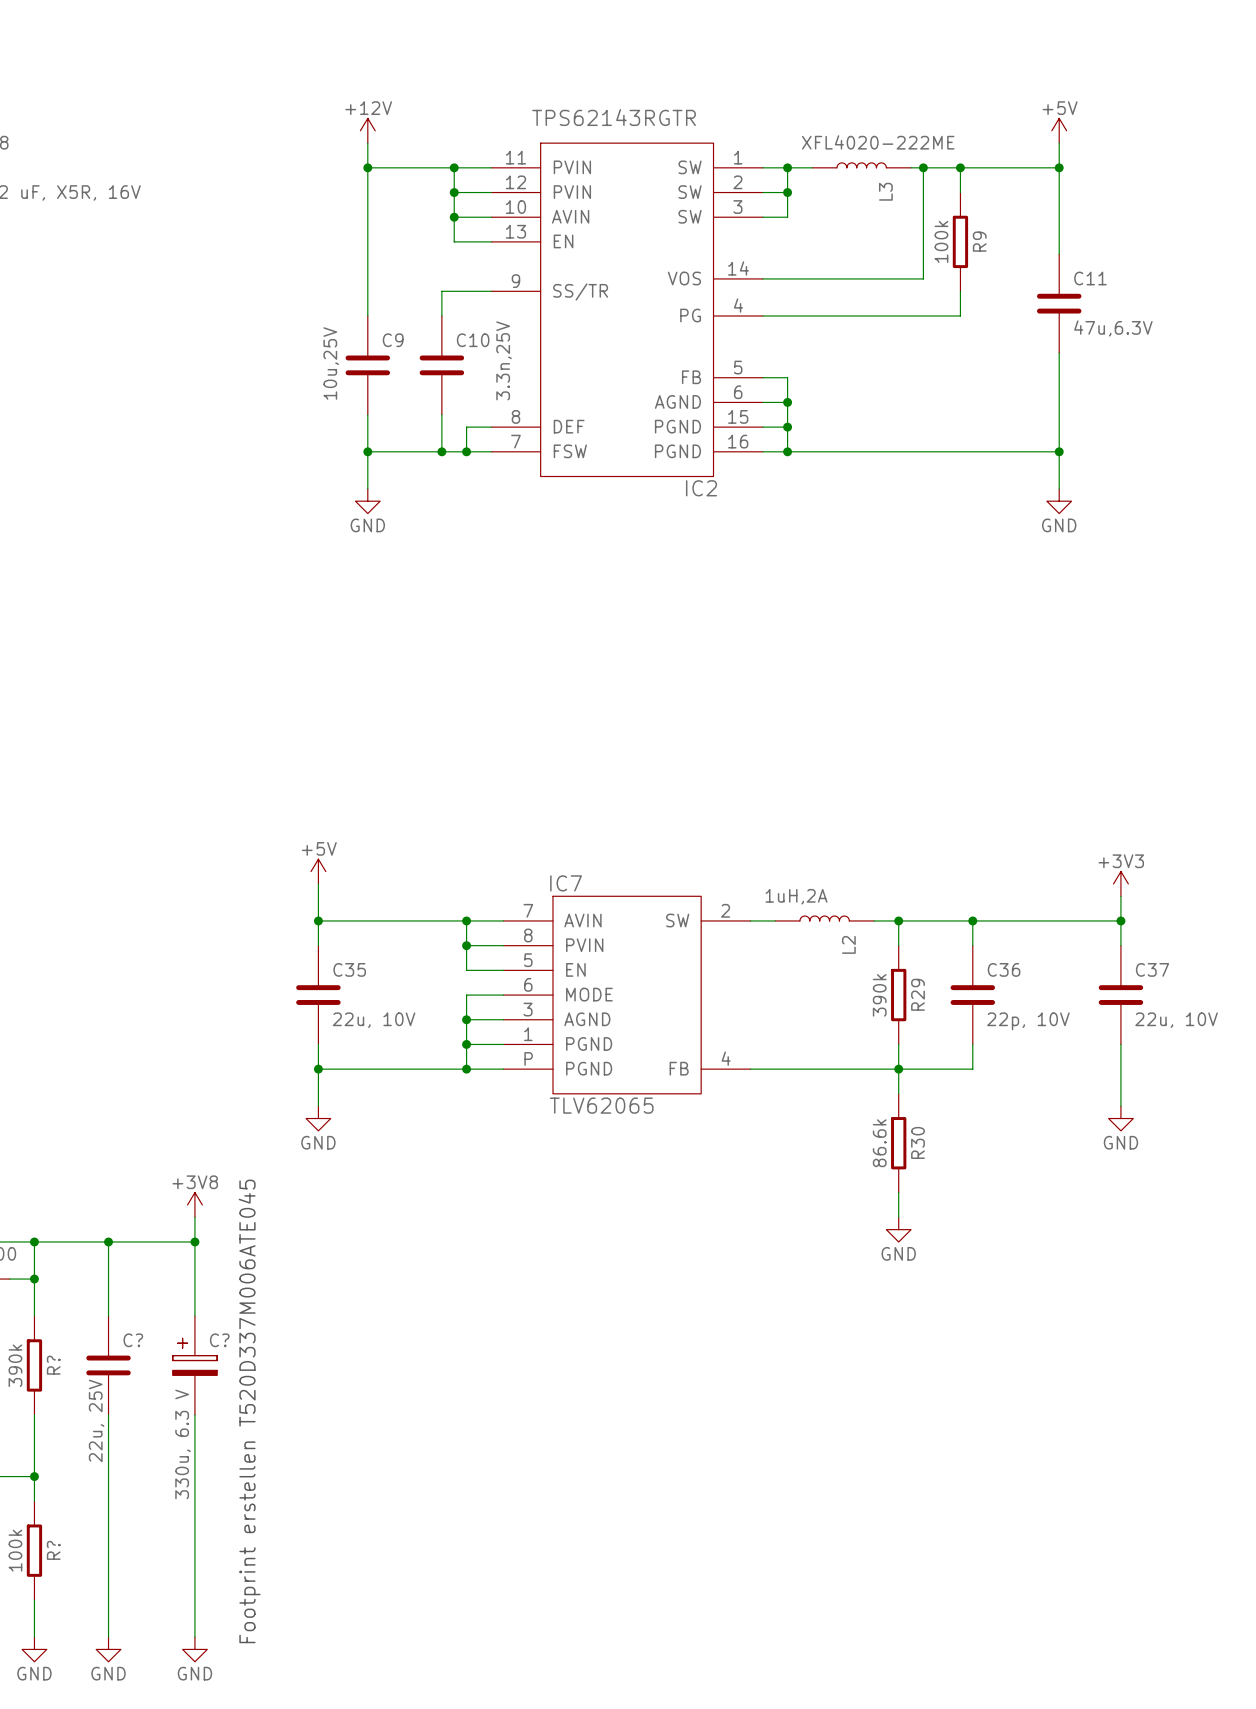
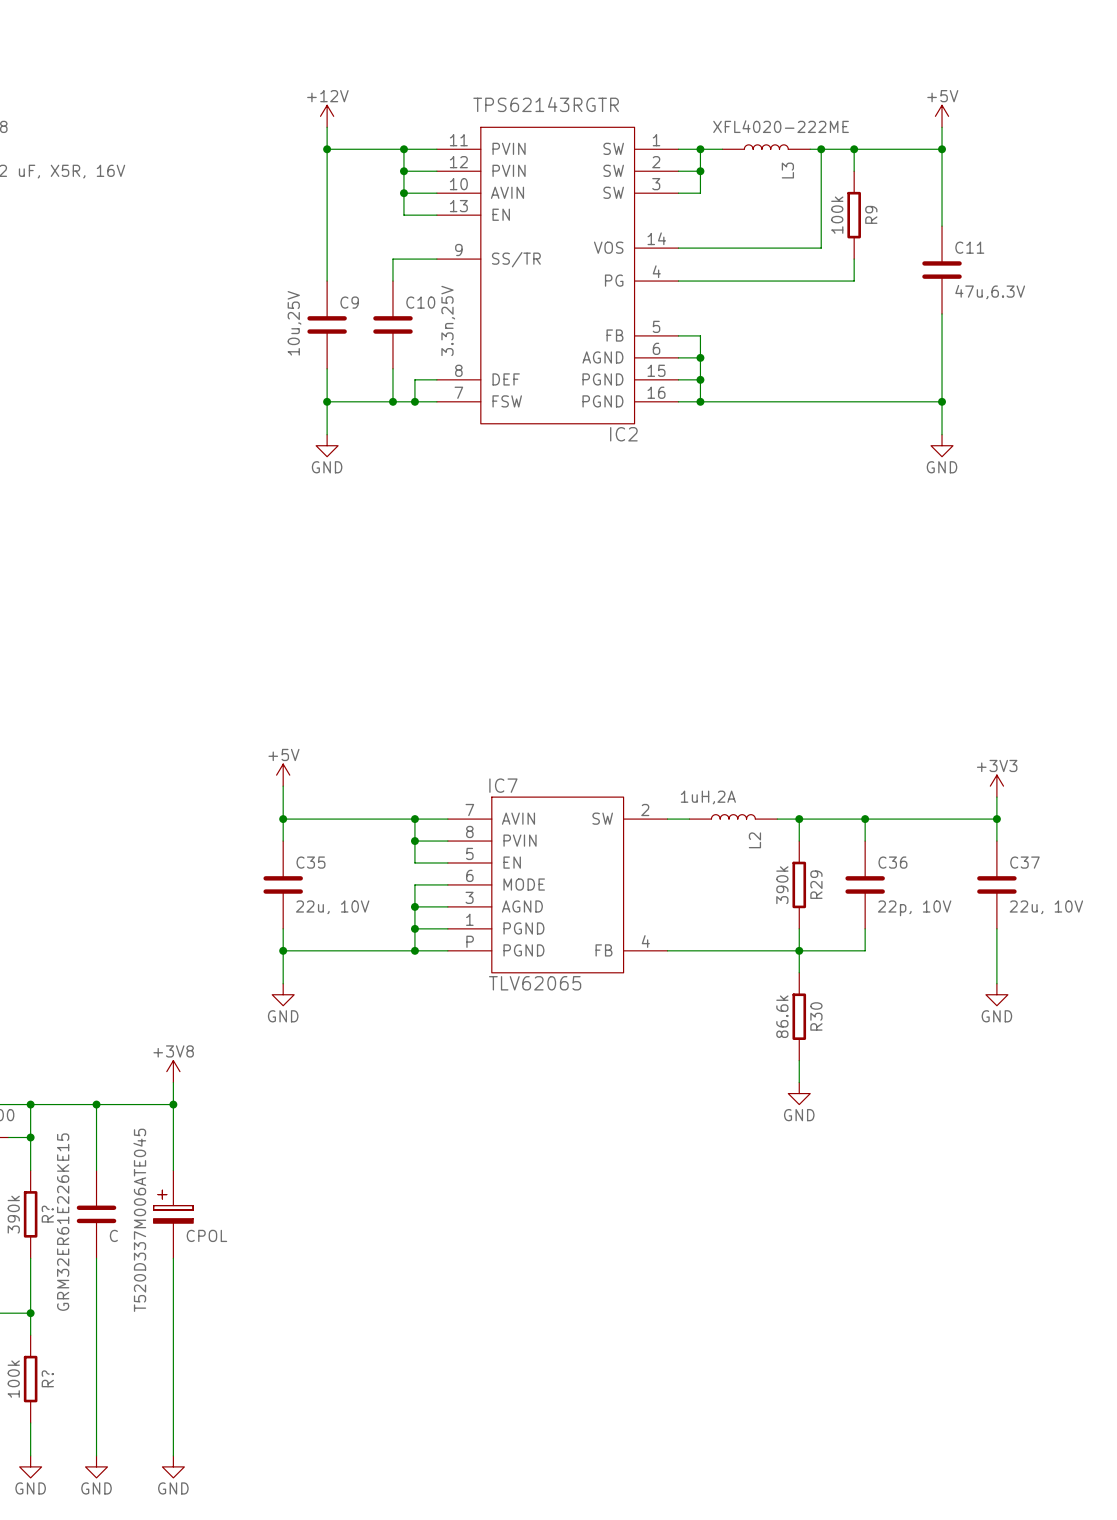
C? name: C? (133, 1340) -> GRM32ER61E226KE15 (63, 1222)
C? name: C? (219, 1340) -> T520D337M006ATE045 (139, 1220)
text: Footprint erstellen T520D337M006ATE045 (249, 1411) -> none
C? value: 22u, 25V (96, 1420) -> C (113, 1235)
C? value: 330u, 6.3 V (183, 1444) -> CPOL (206, 1235)

